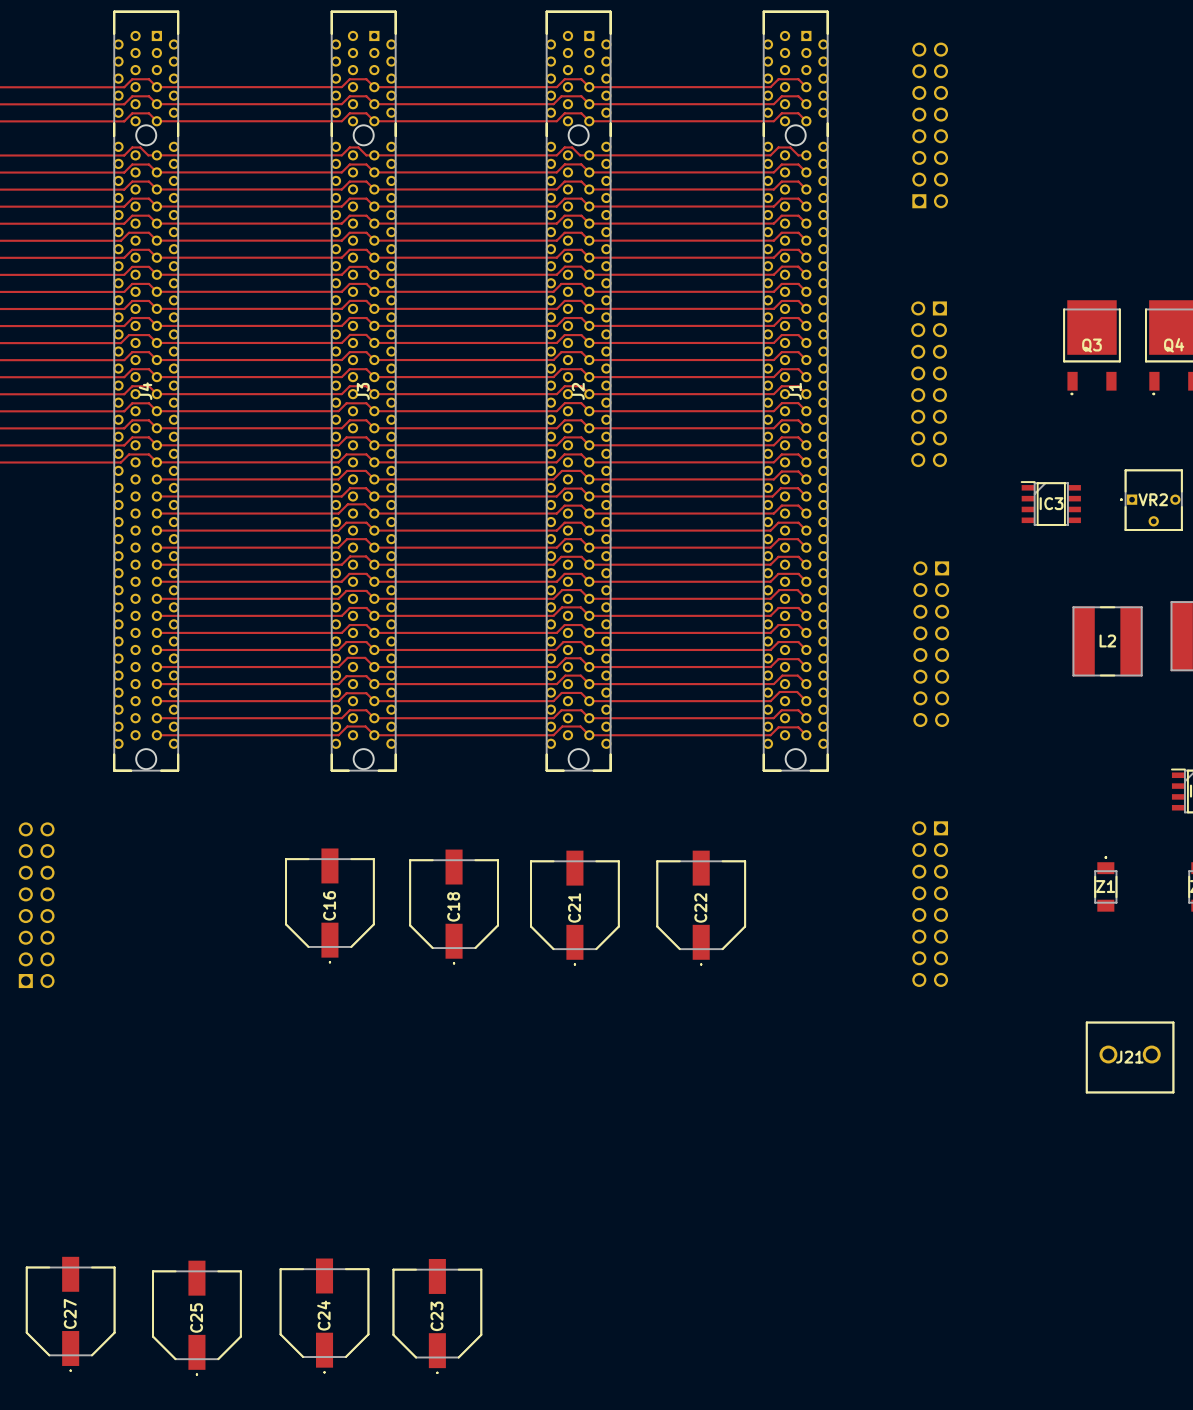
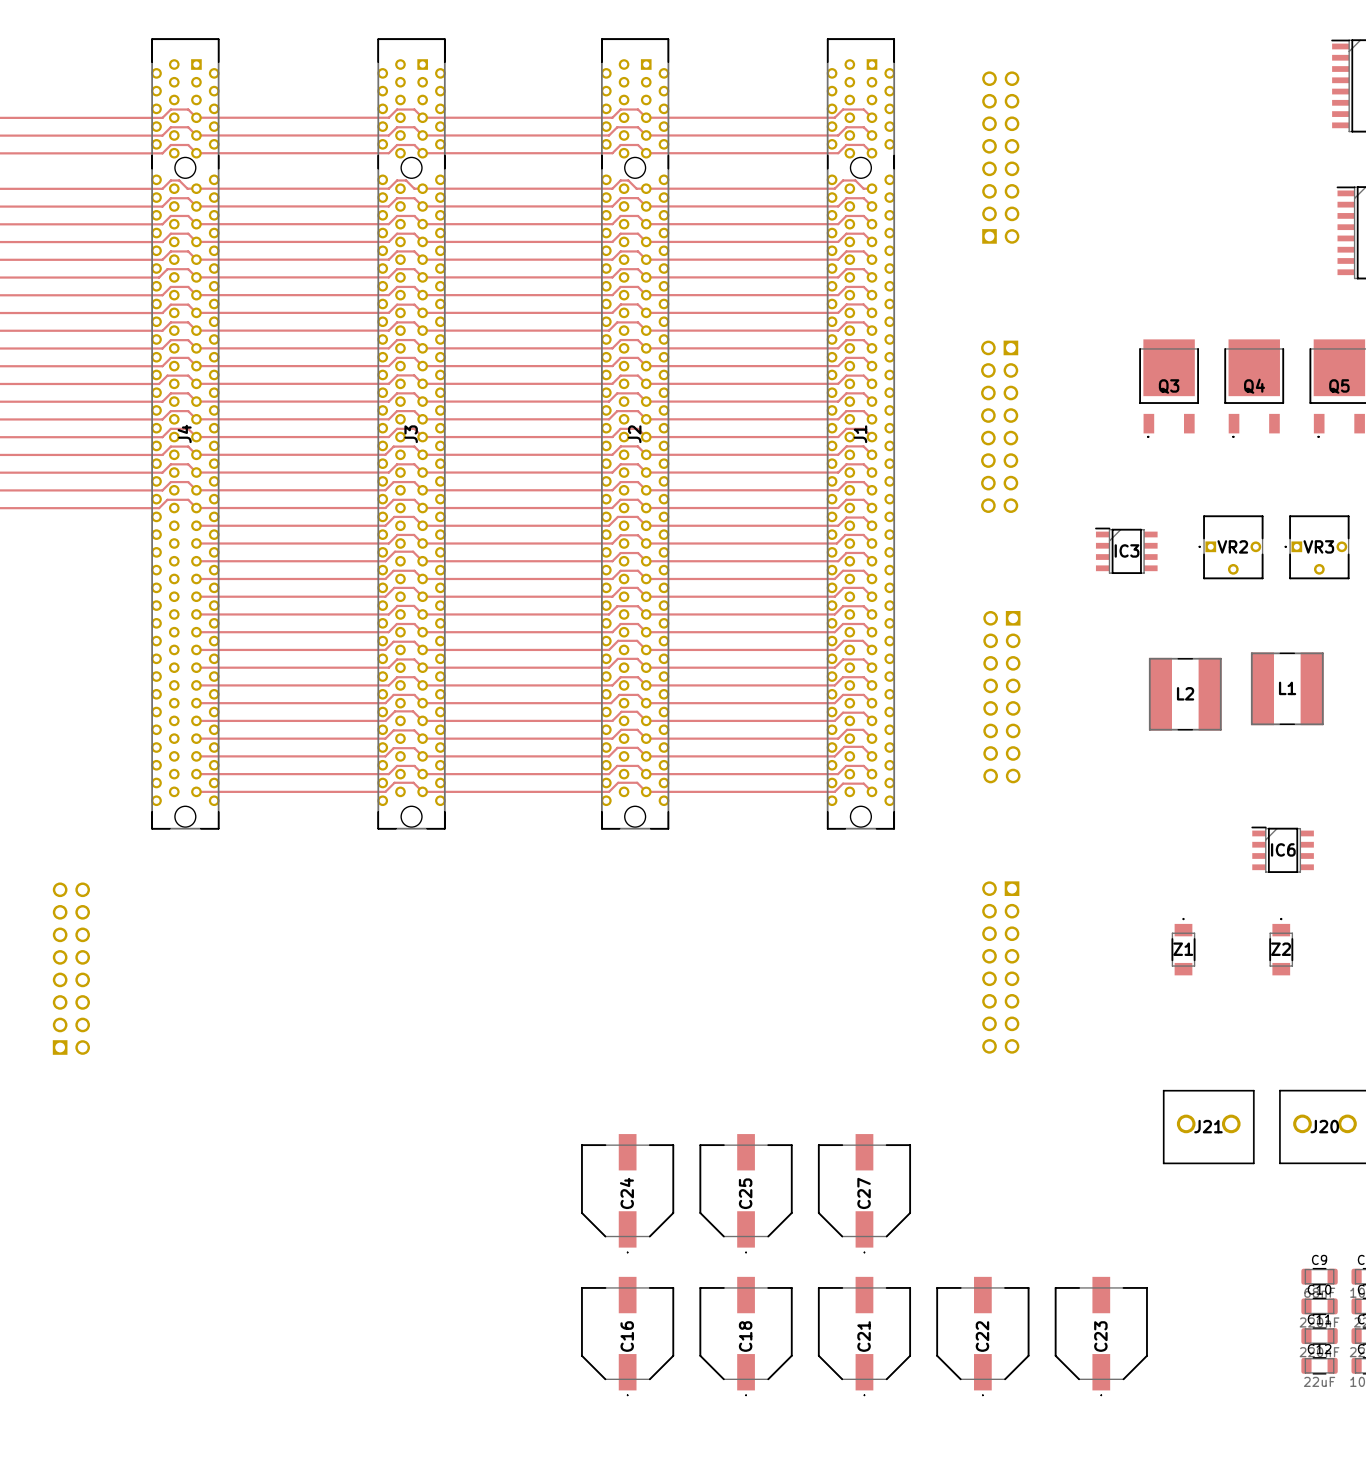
C16 position: (329, 905) -> (627, 1336)
C18 position: (454, 906) -> (746, 1336)
C21 position: (574, 907) -> (864, 1336)
C22 position: (701, 907) -> (982, 1336)
C27 position: (70, 1313) -> (864, 1193)
C24 position: (324, 1315) -> (627, 1193)
C23 position: (437, 1316) -> (1101, 1336)
C25 position: (196, 1317) -> (746, 1193)

